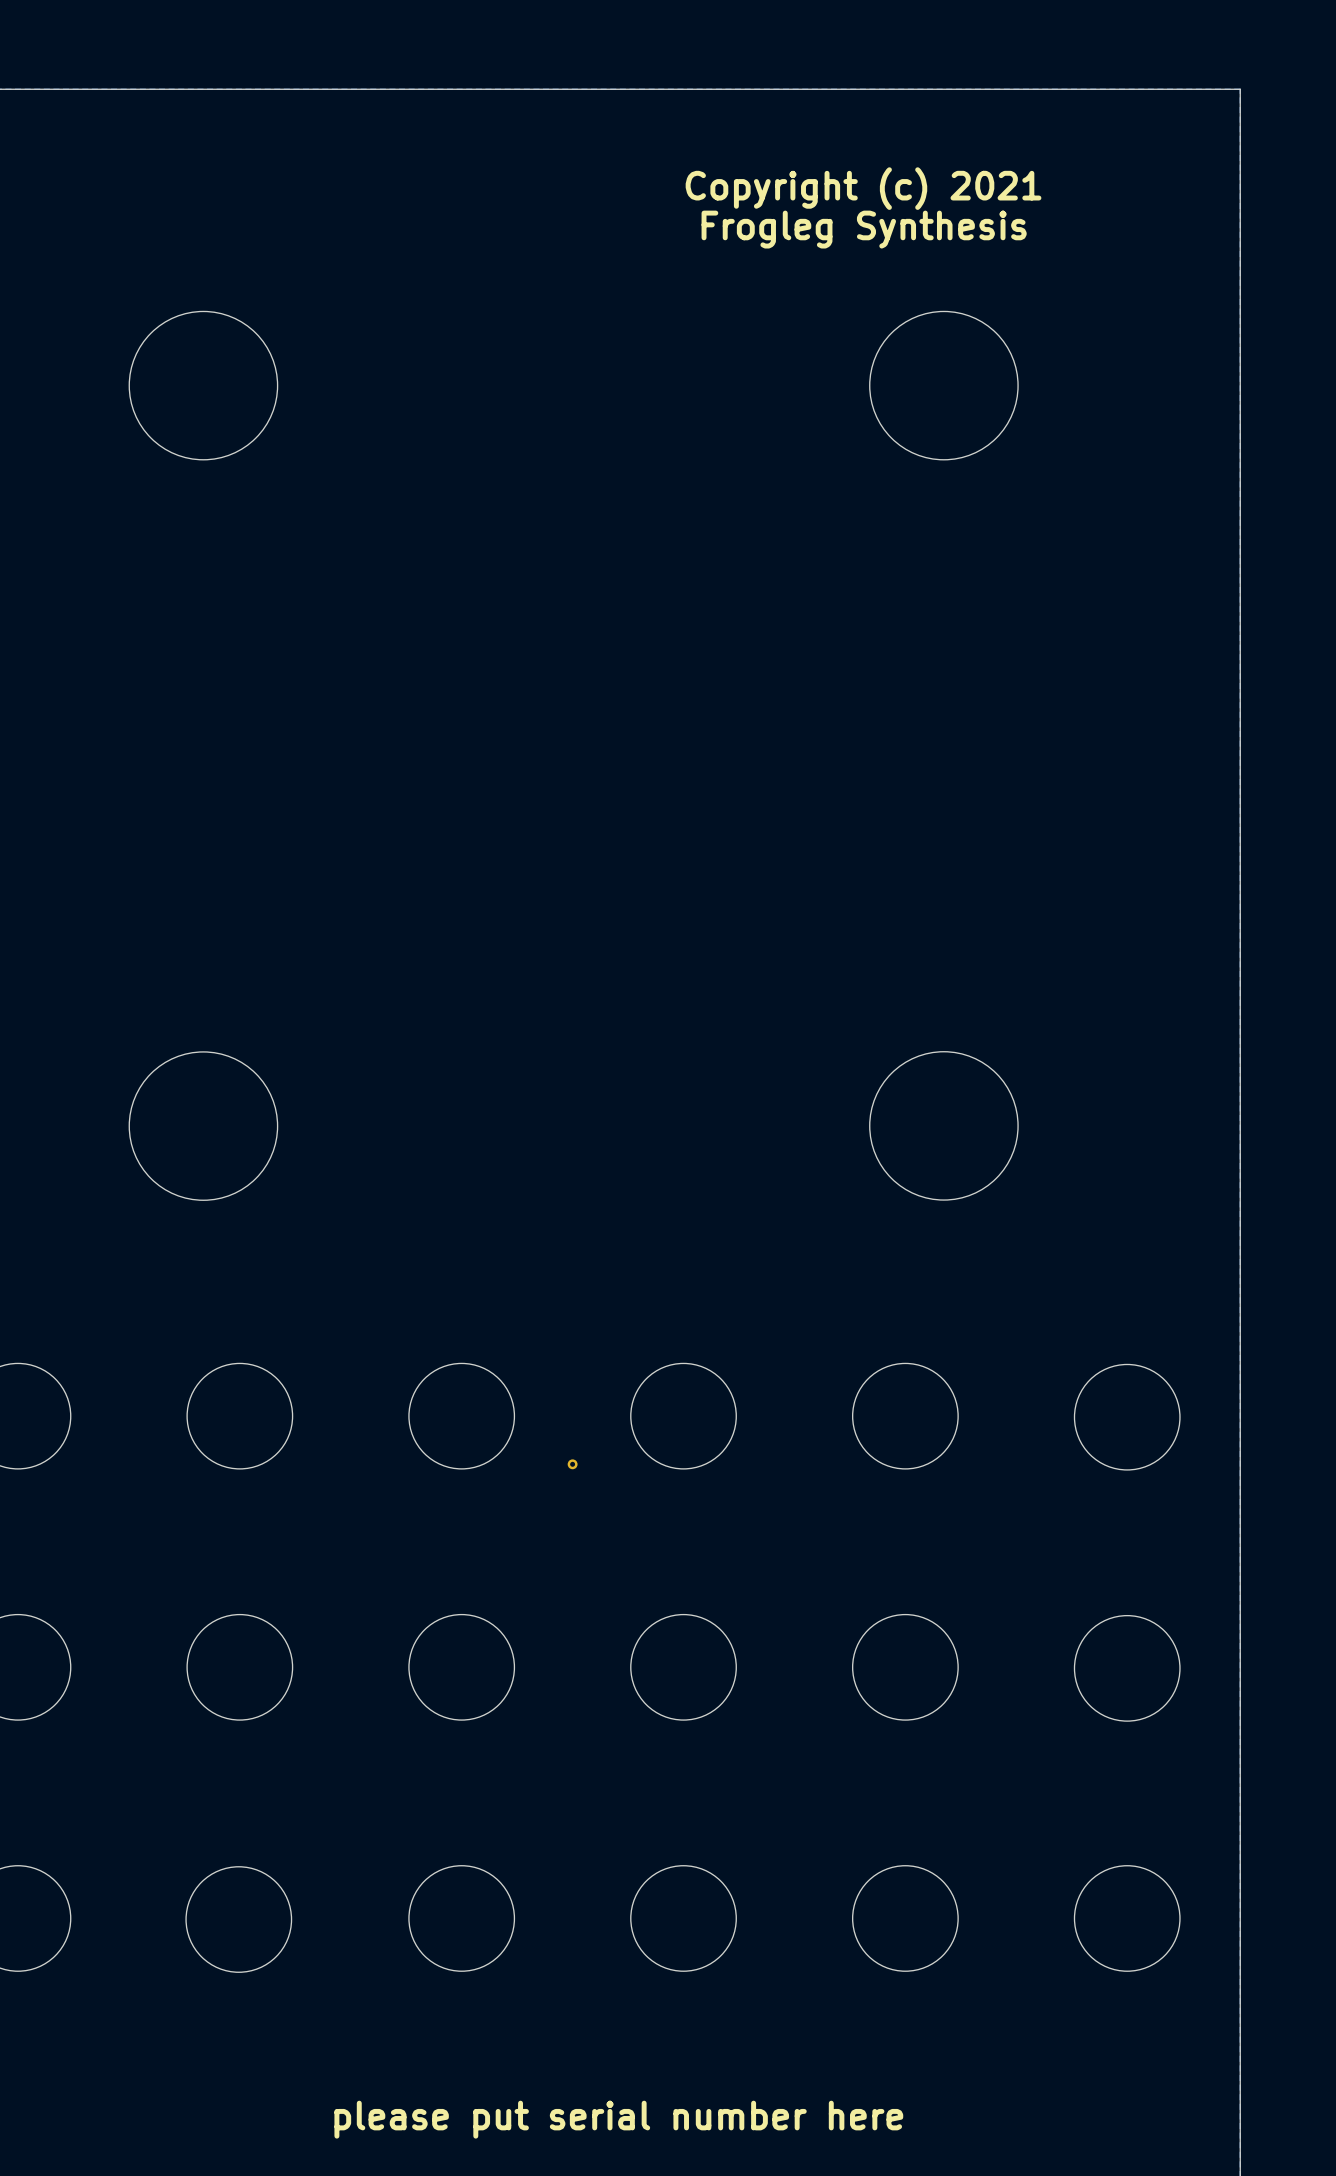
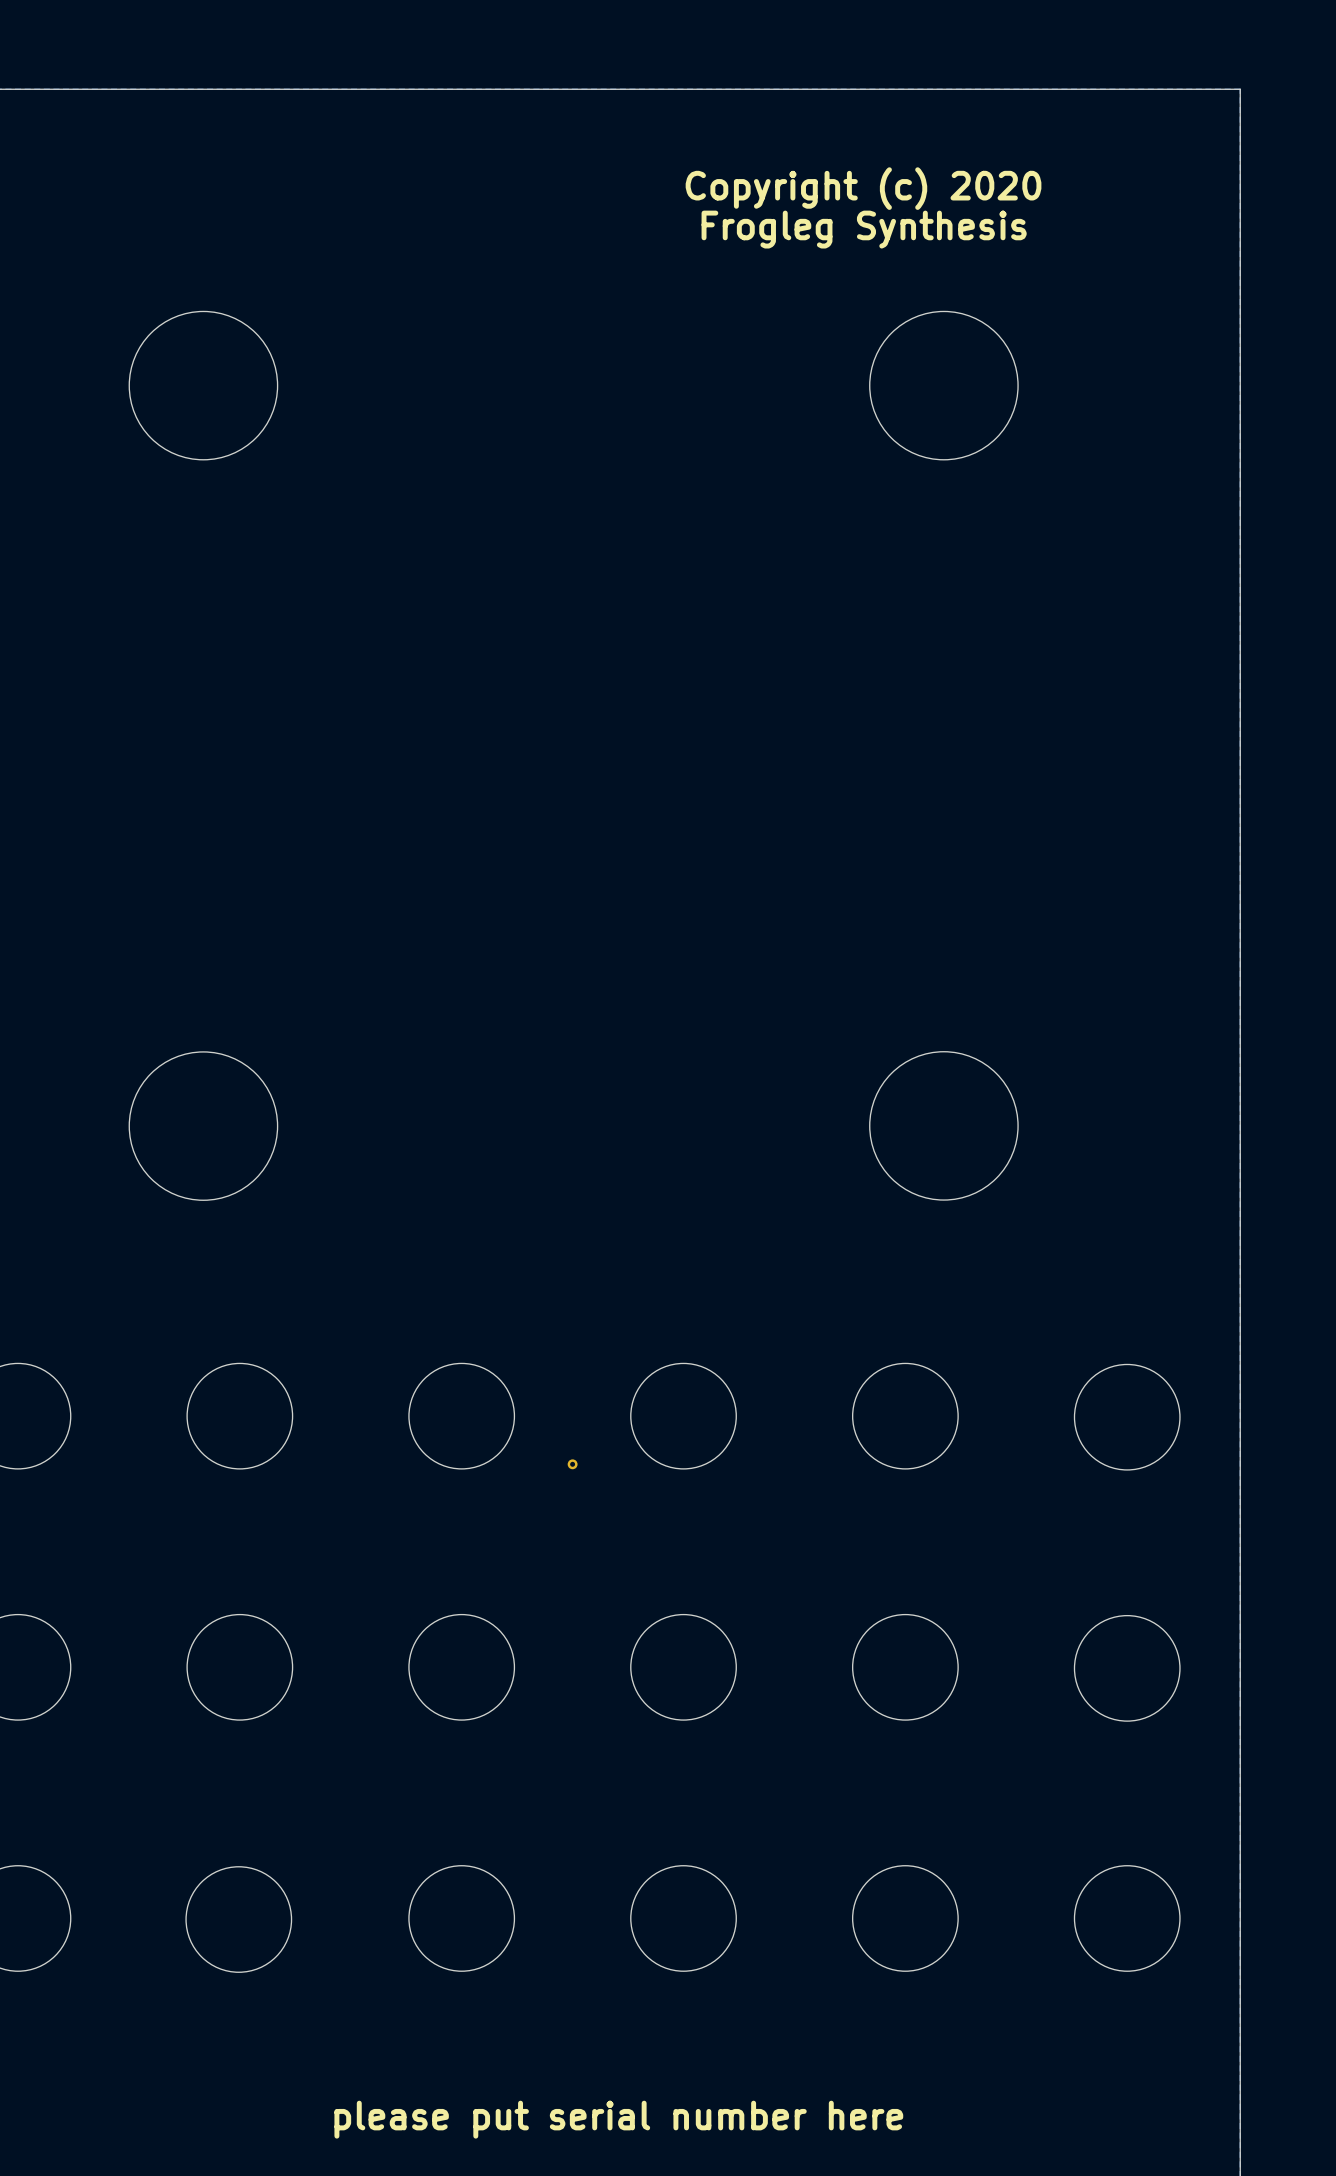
text: Copyright (c) 2021 (863, 188) -> Copyright (c) 2020 (863, 188)

